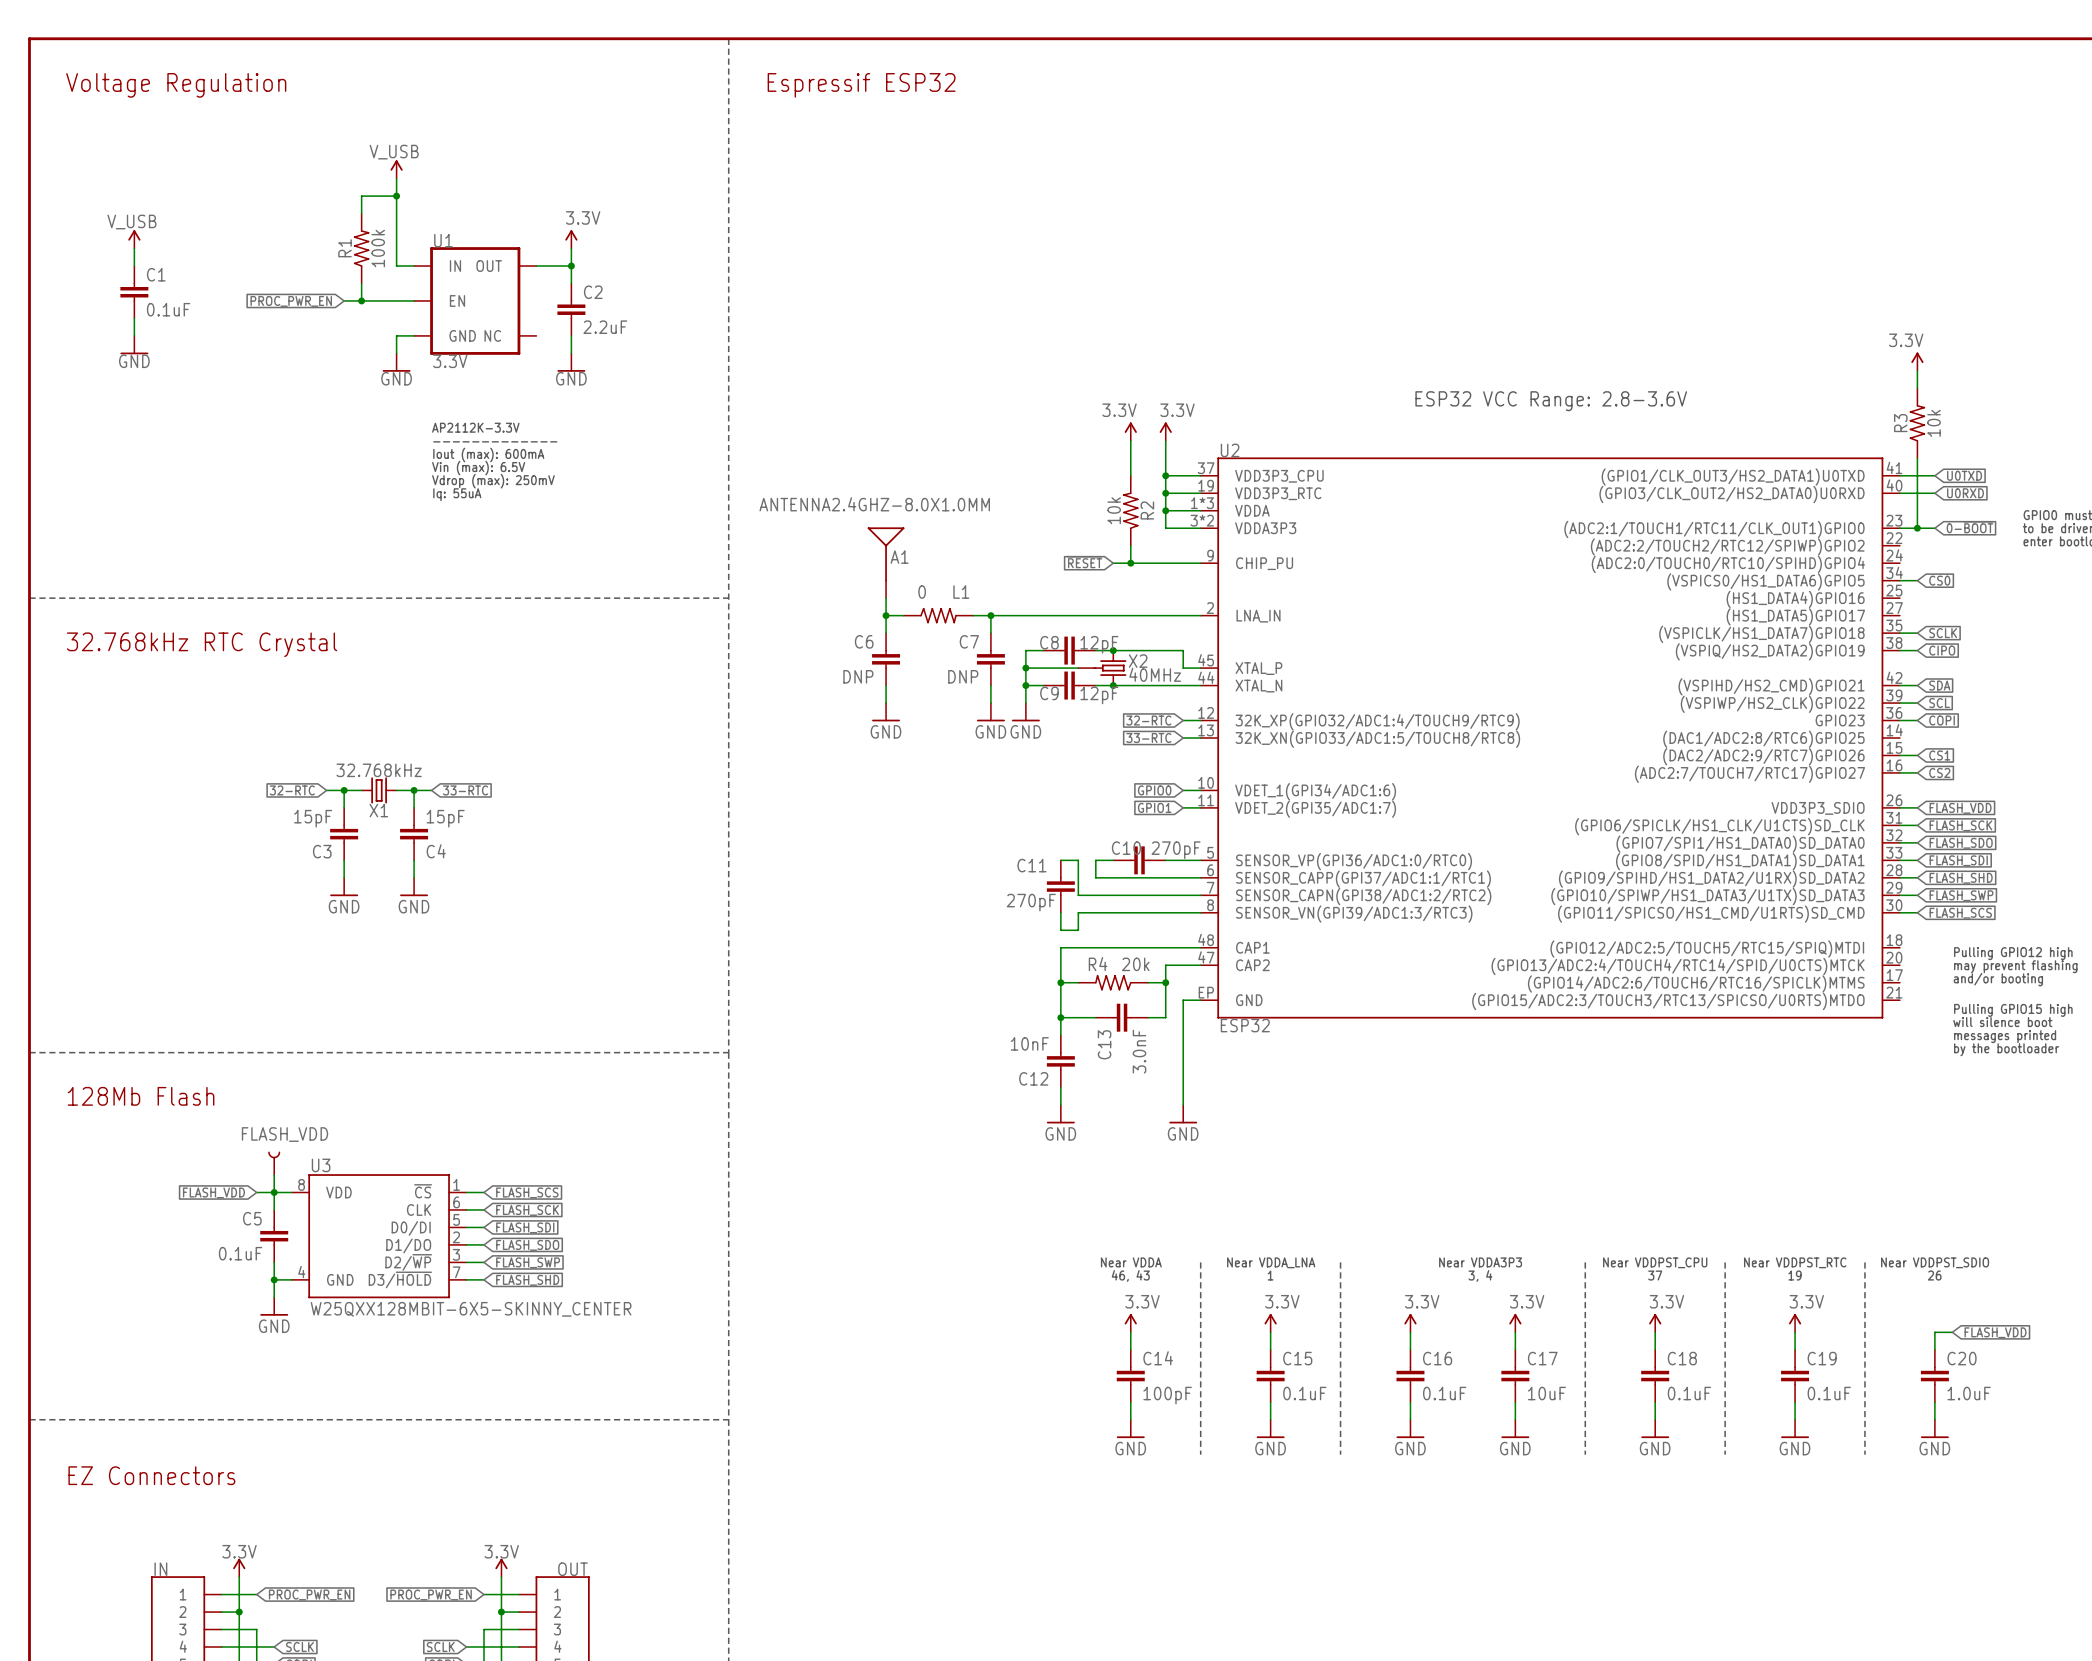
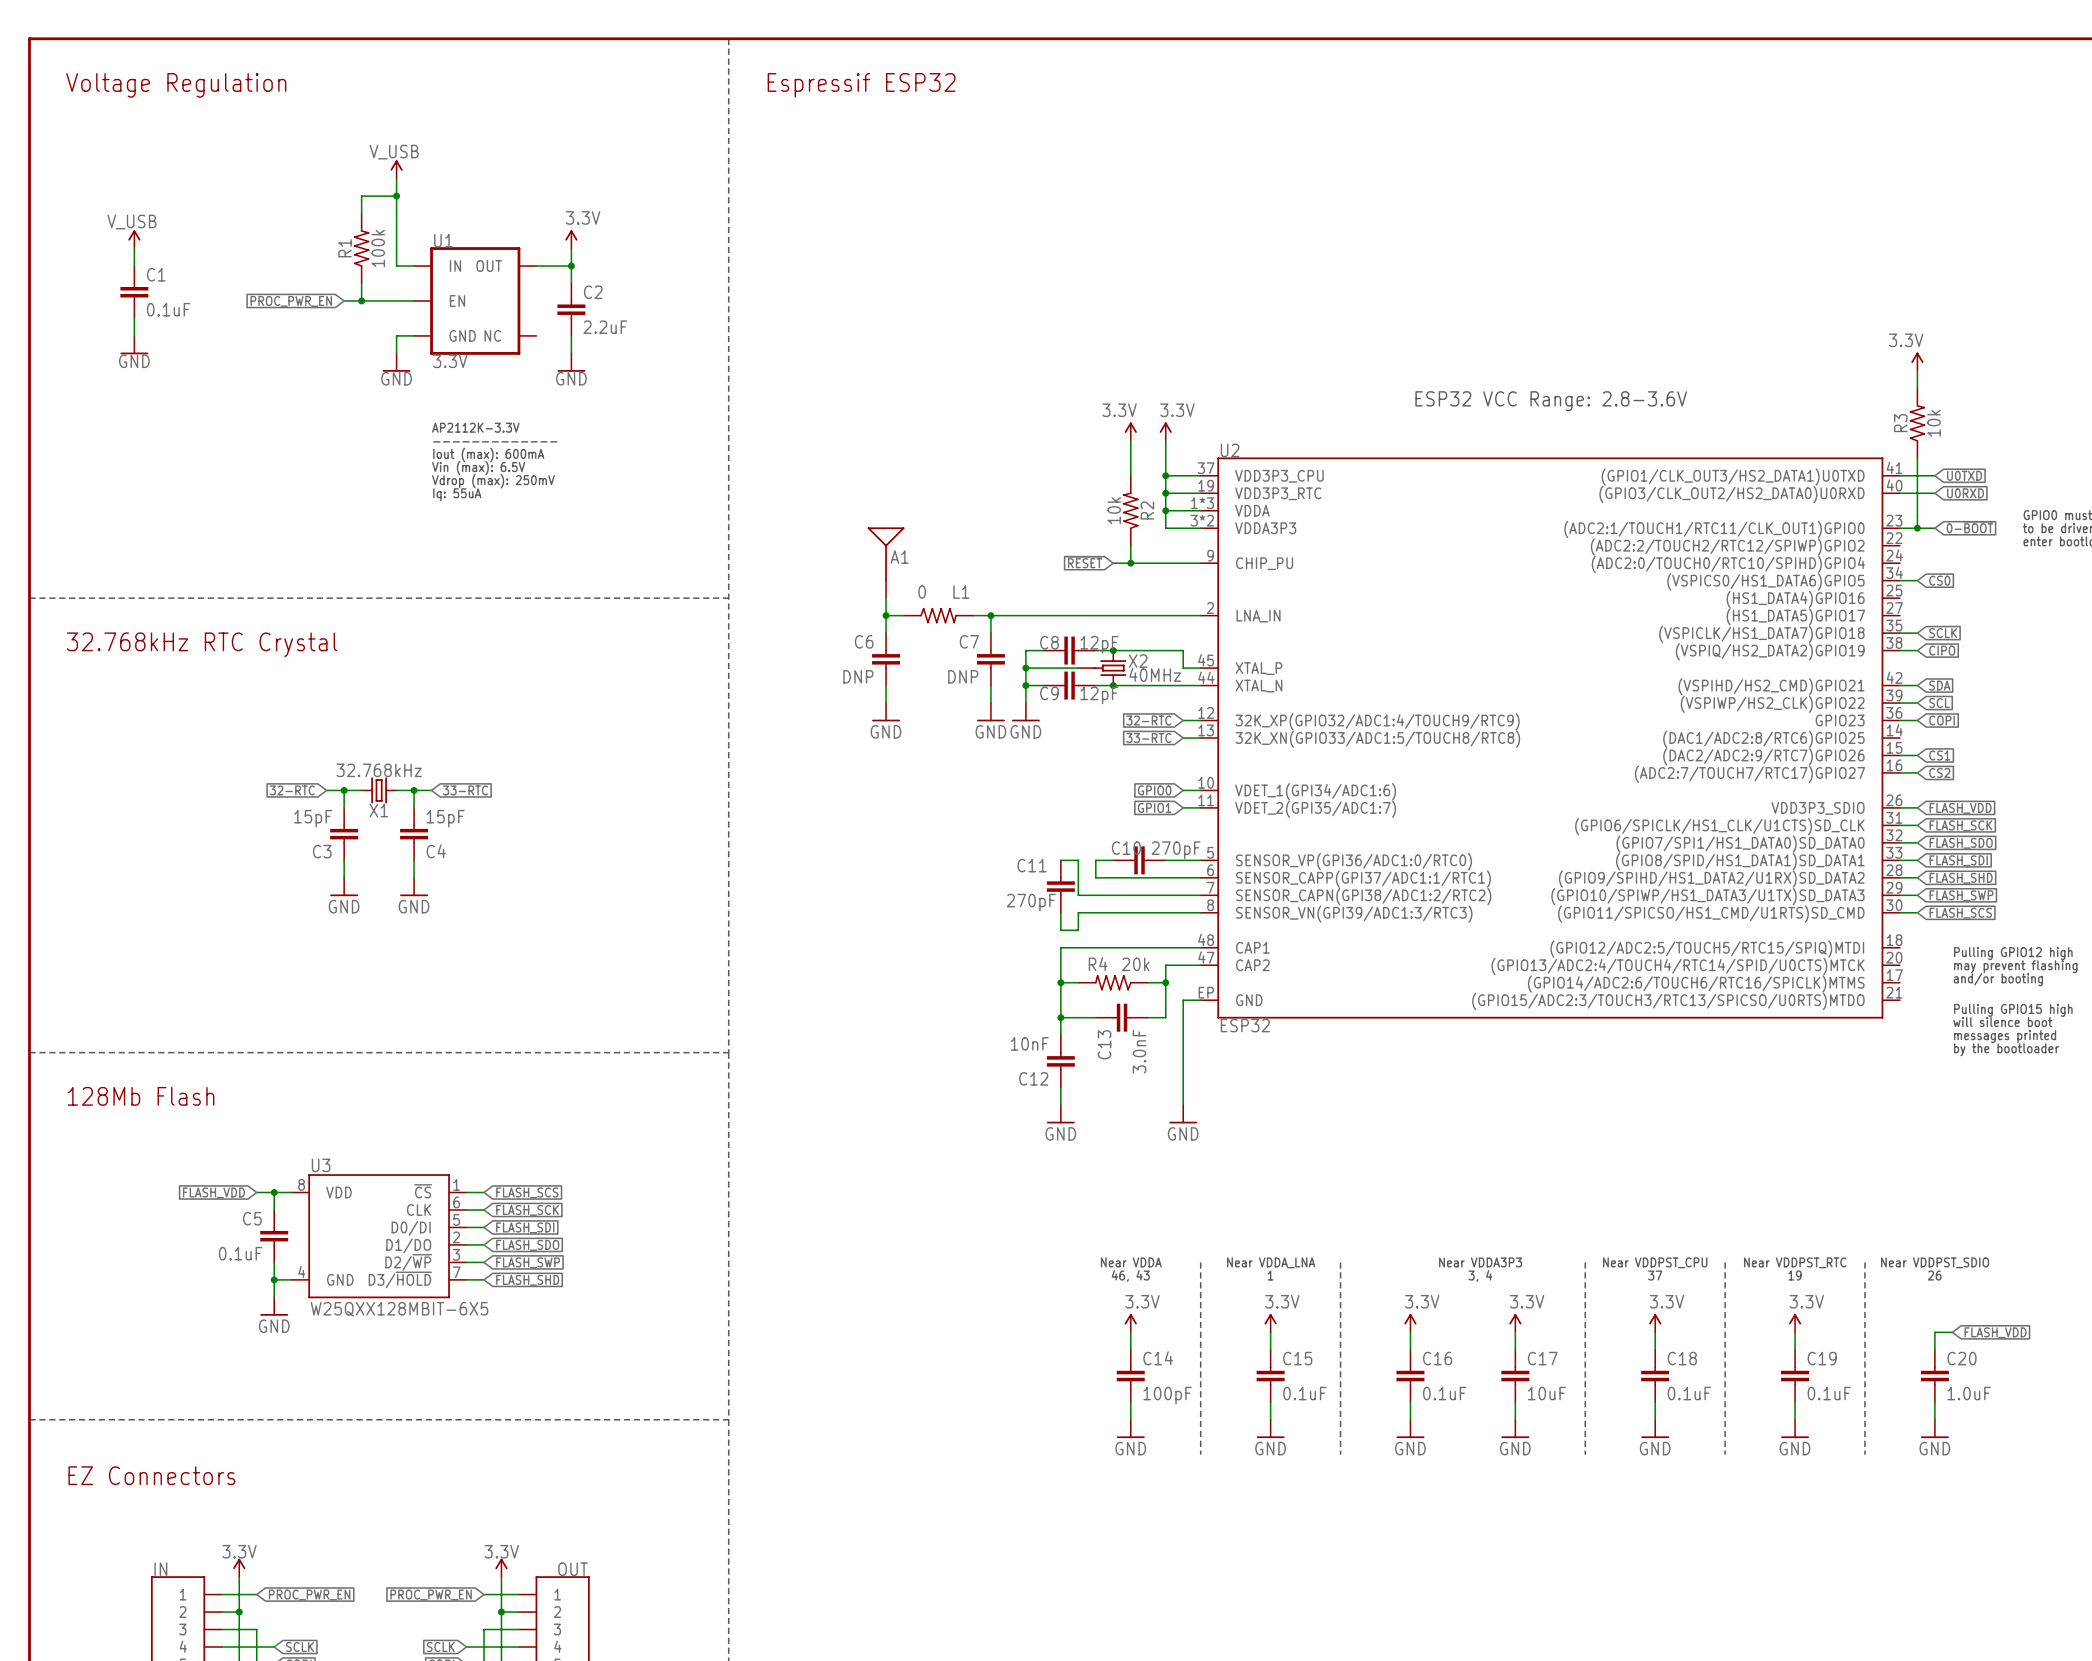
A1 value: ANTENNA2.4GHZ-8.0X1.0MM (874, 504) -> none
FLASH_VDD: (274, 1163) -> none
wire: (274, 1175) (274, 1192) -> none
U3 value: W25QXX128MBIT-6X5-SKINNY_CENTER (471, 1309) -> W25QXX128MBIT-6X5 (399, 1309)

